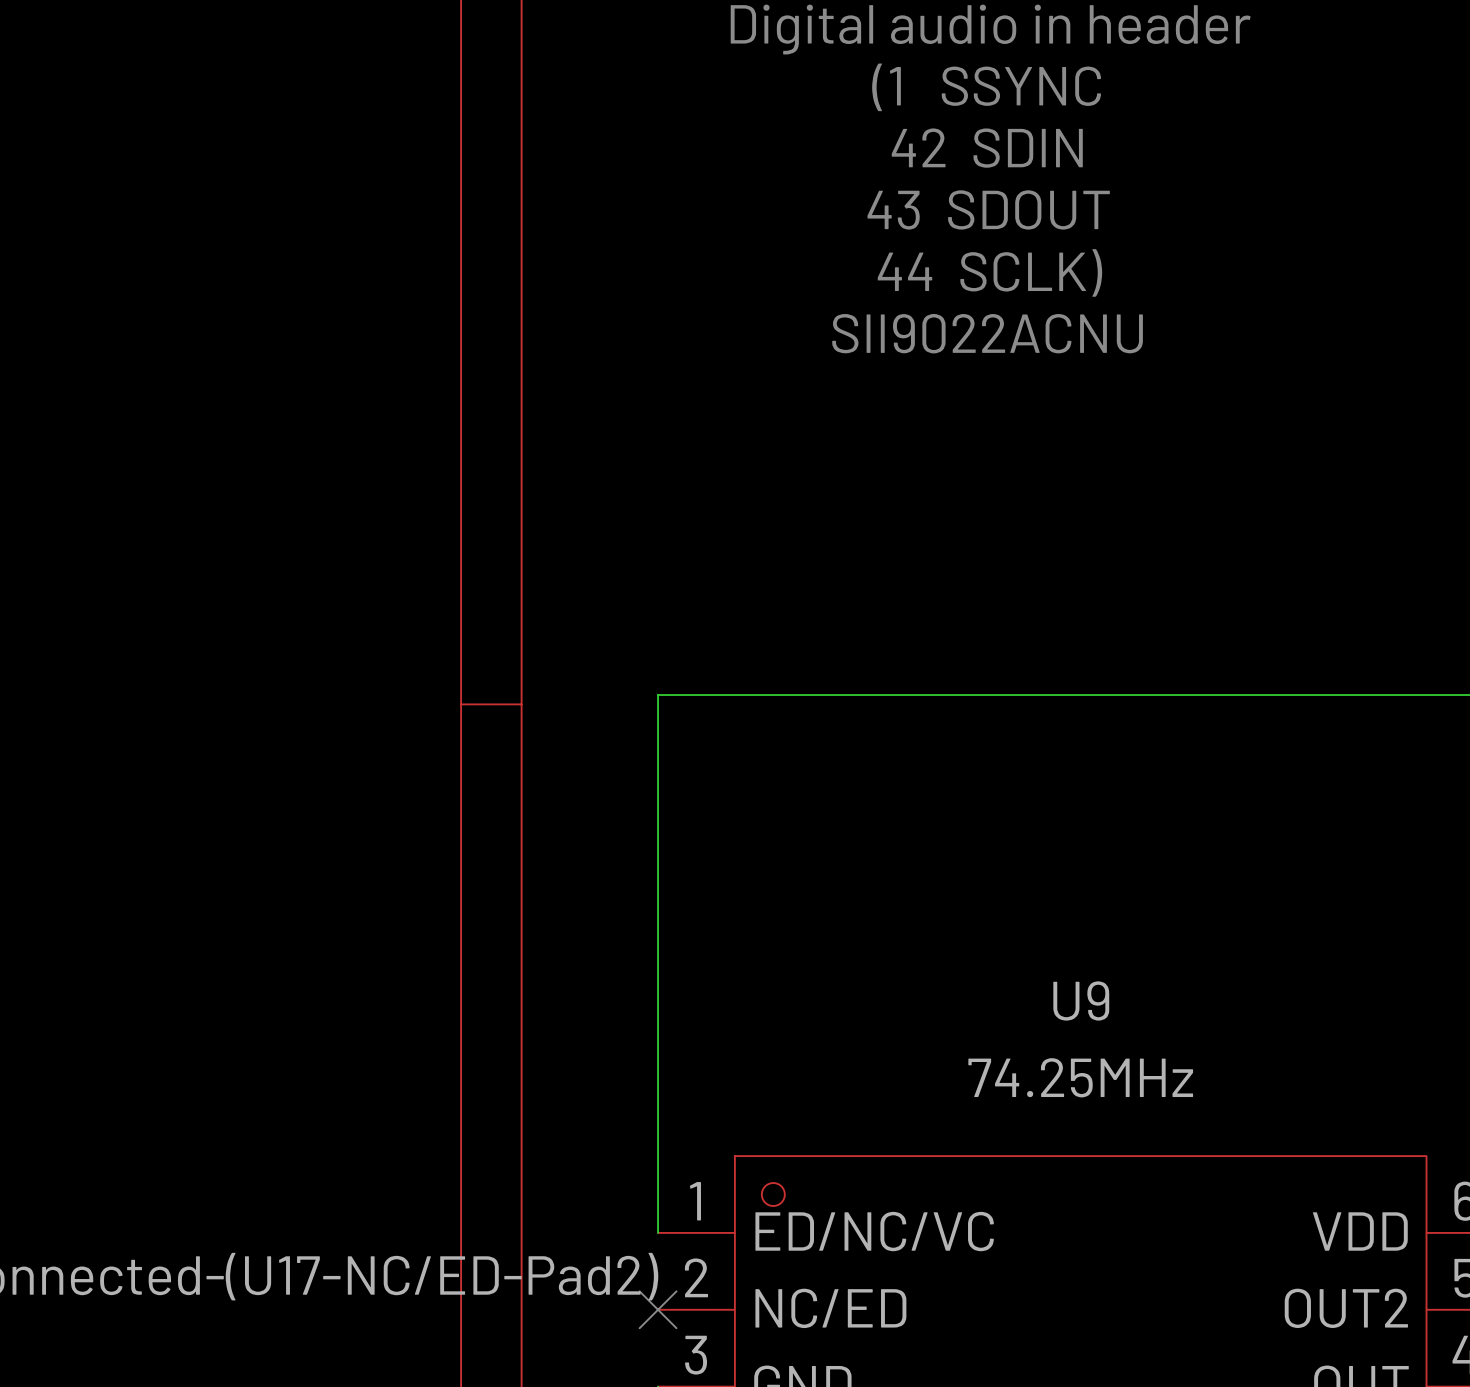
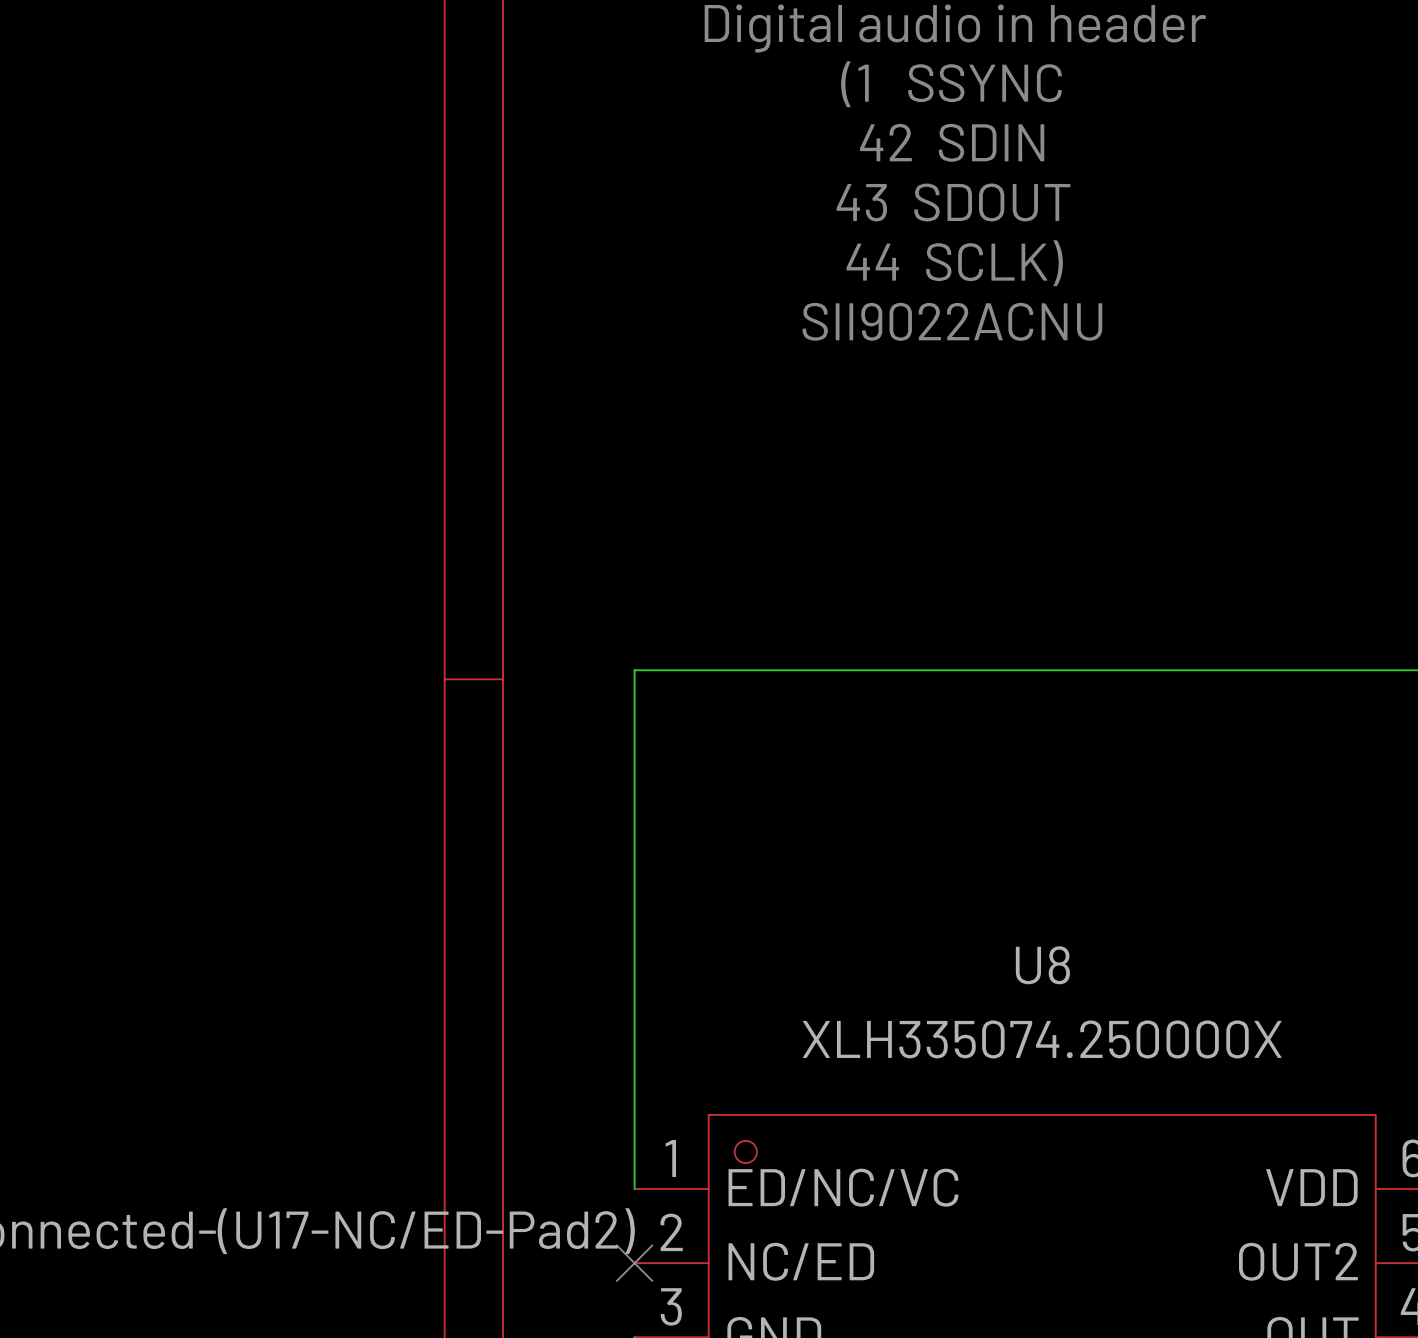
U9 name: U9 (1081, 1000) -> U8 (1042, 965)
U9 value: 74.25MHz (1080, 1077) -> XLH335074.250000X (1042, 1039)

